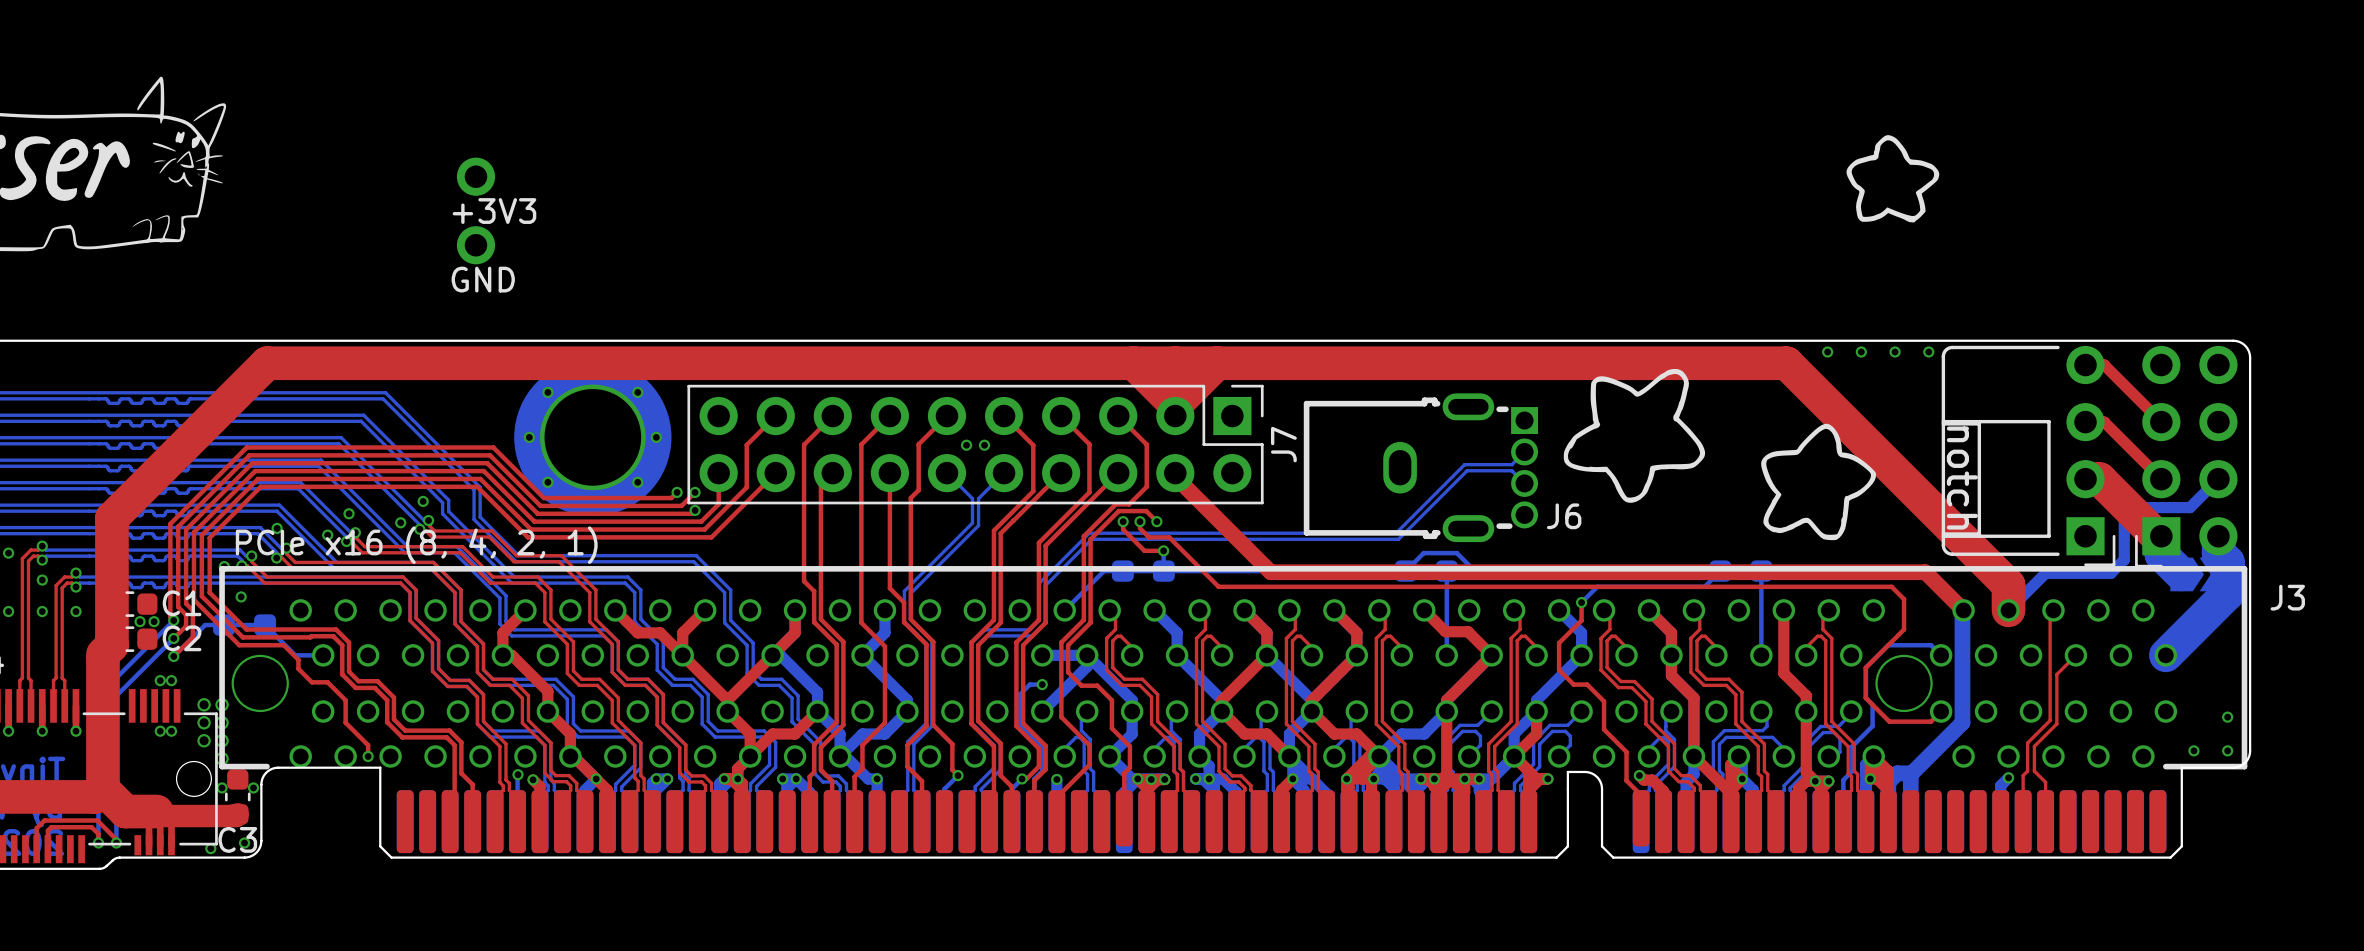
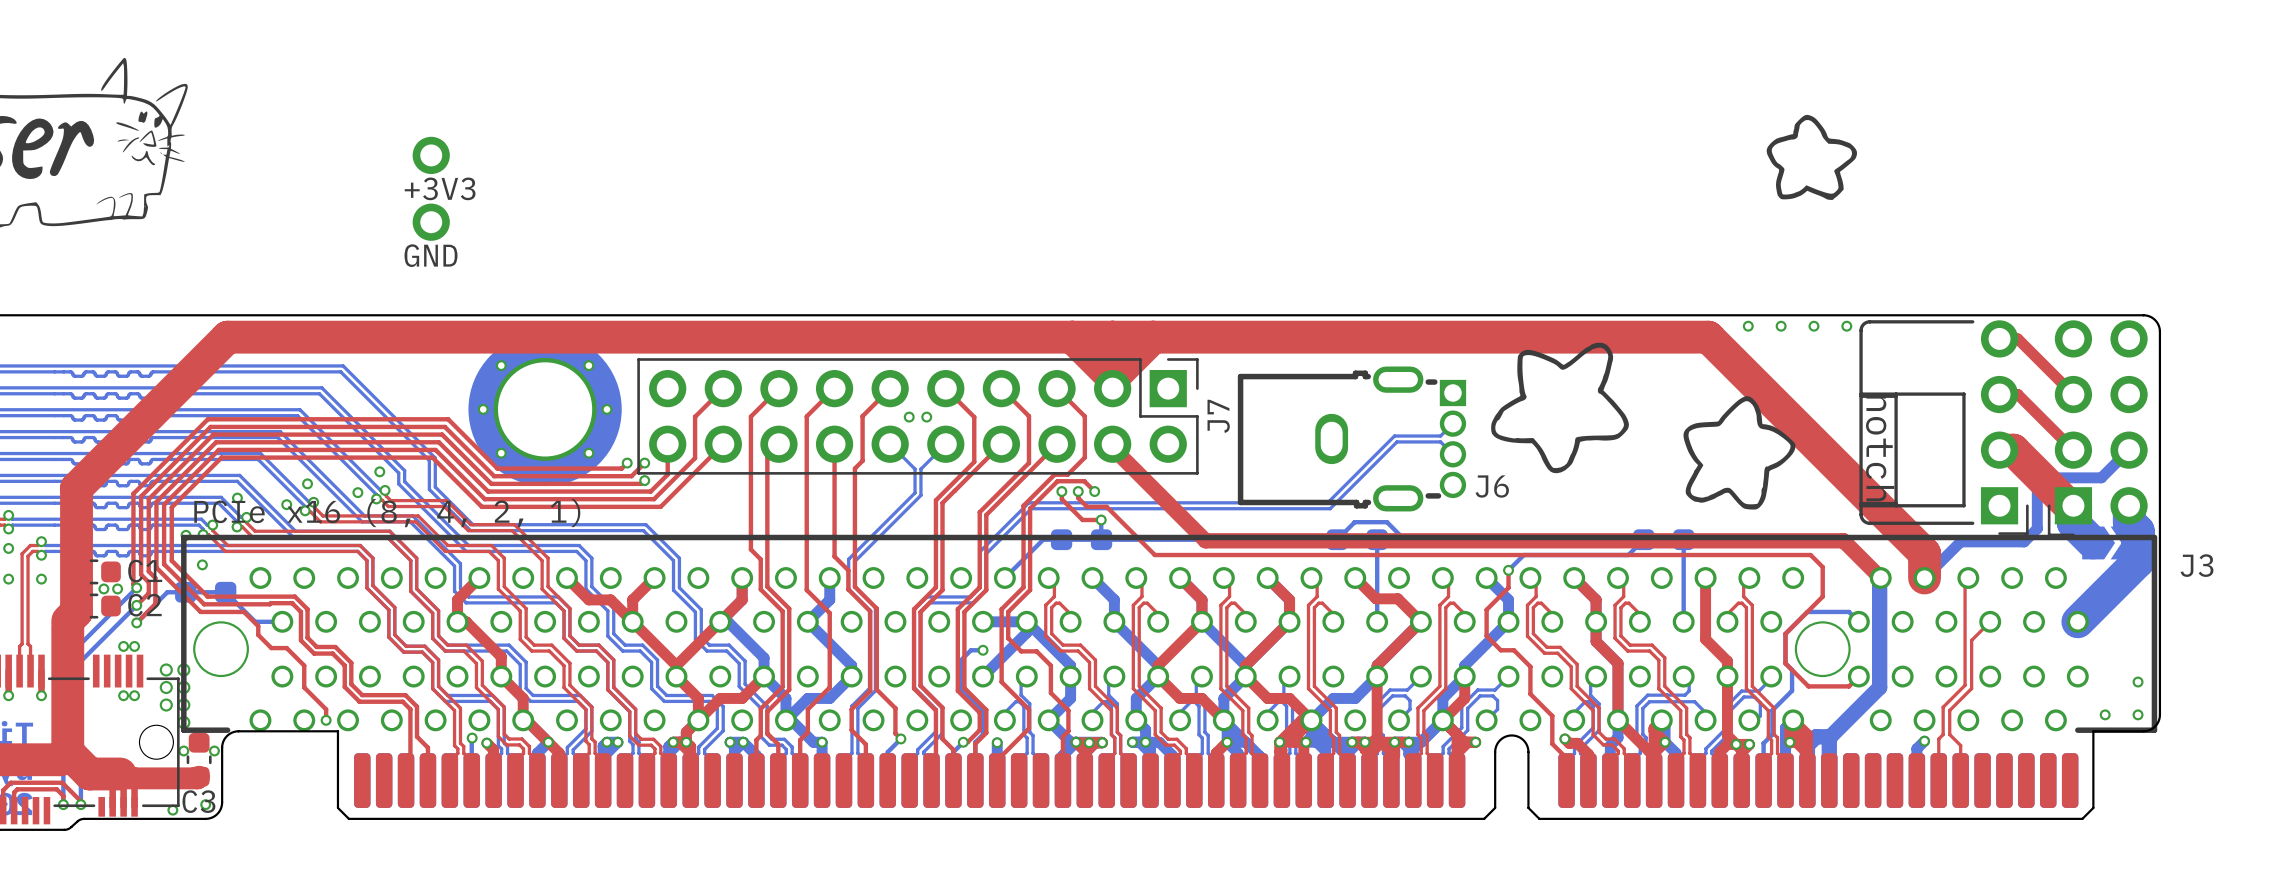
part footprint: [379, 766, 2183, 859] -> [336, 730, 2095, 820]

